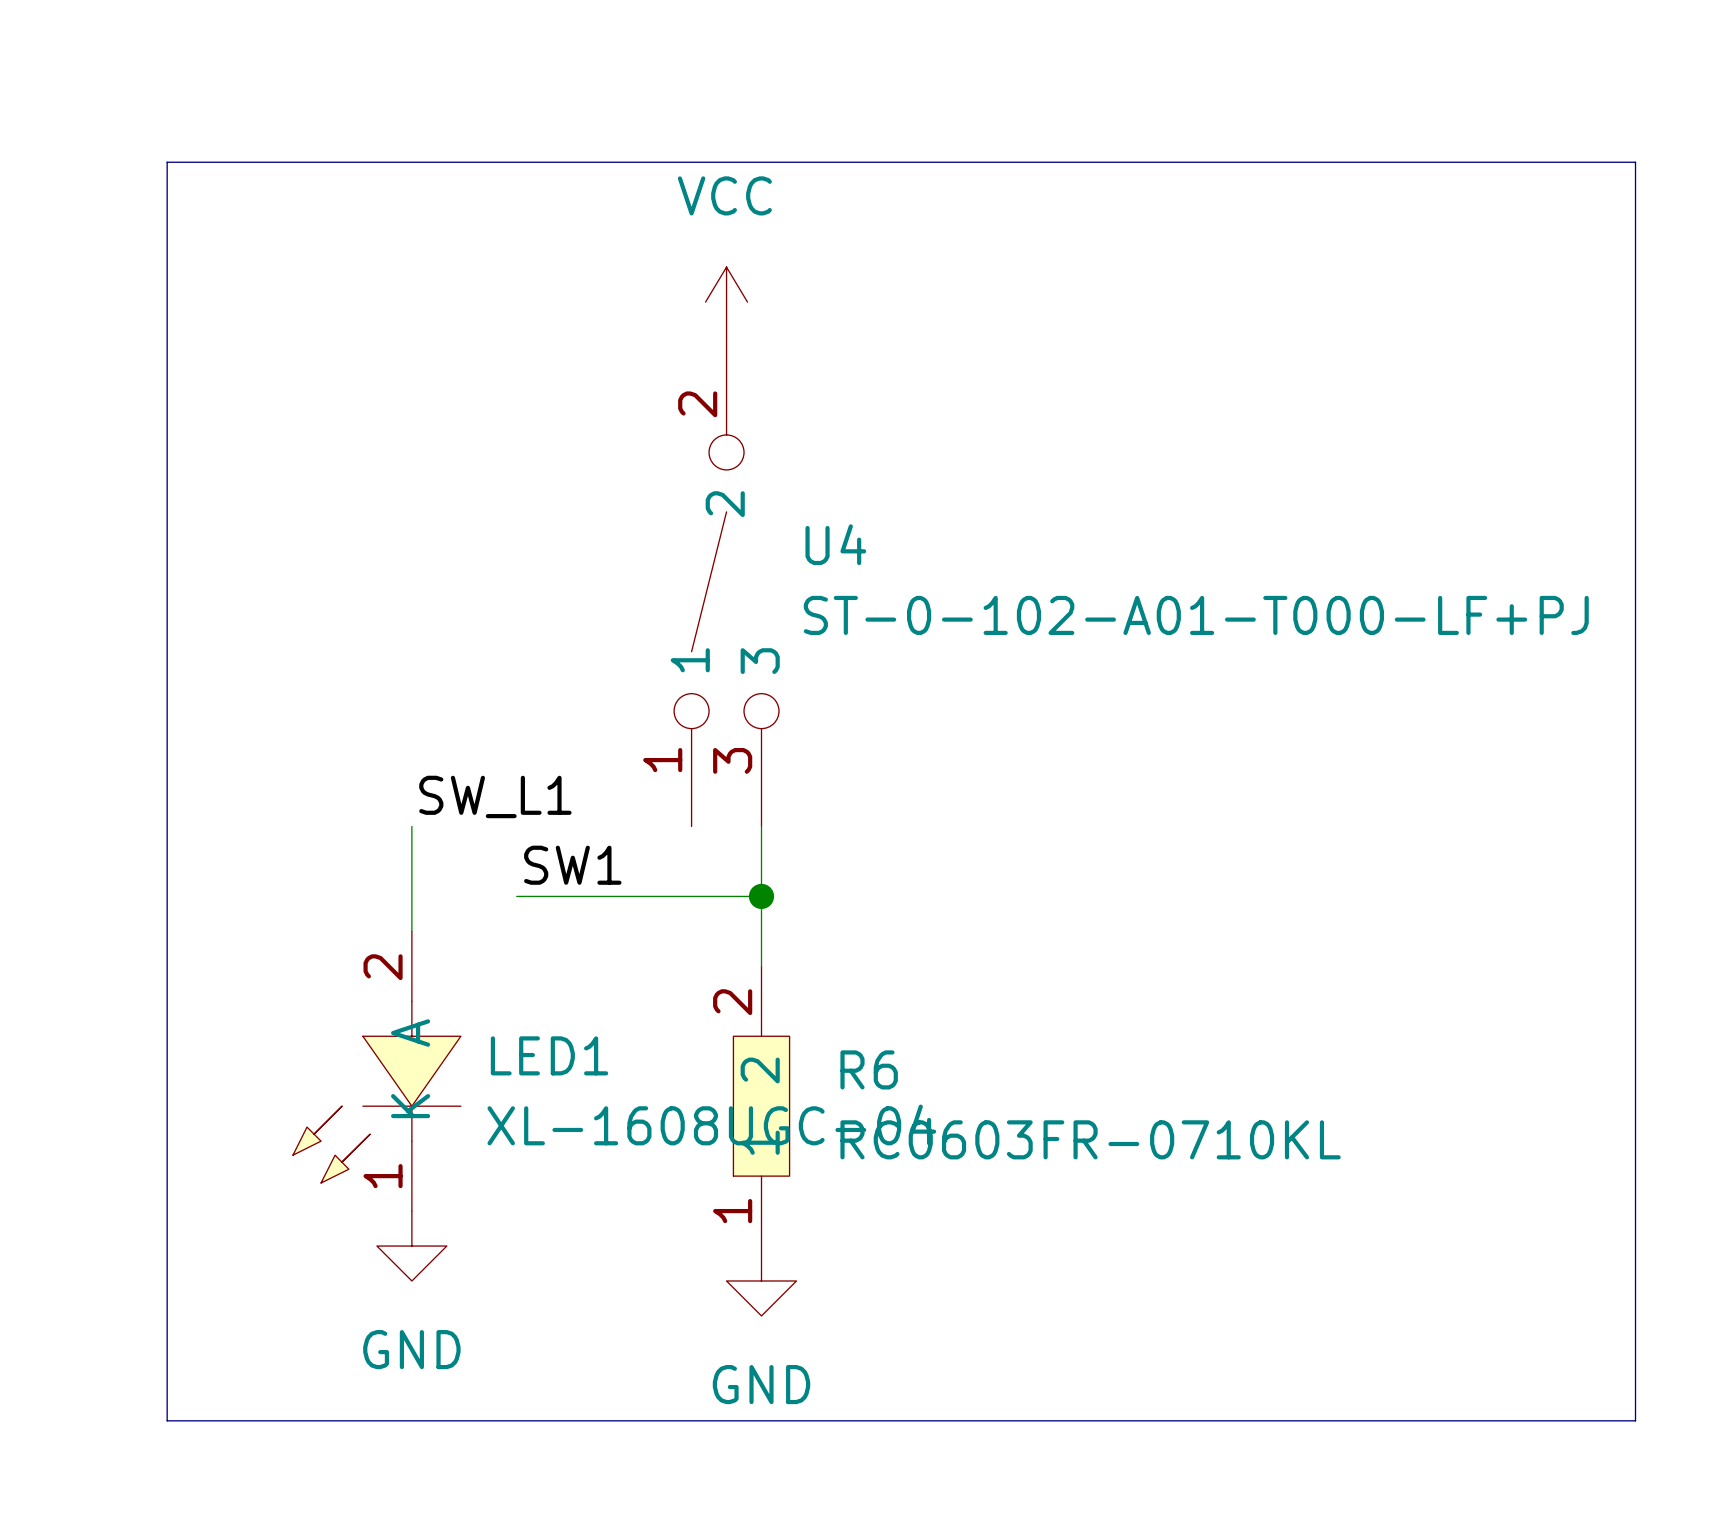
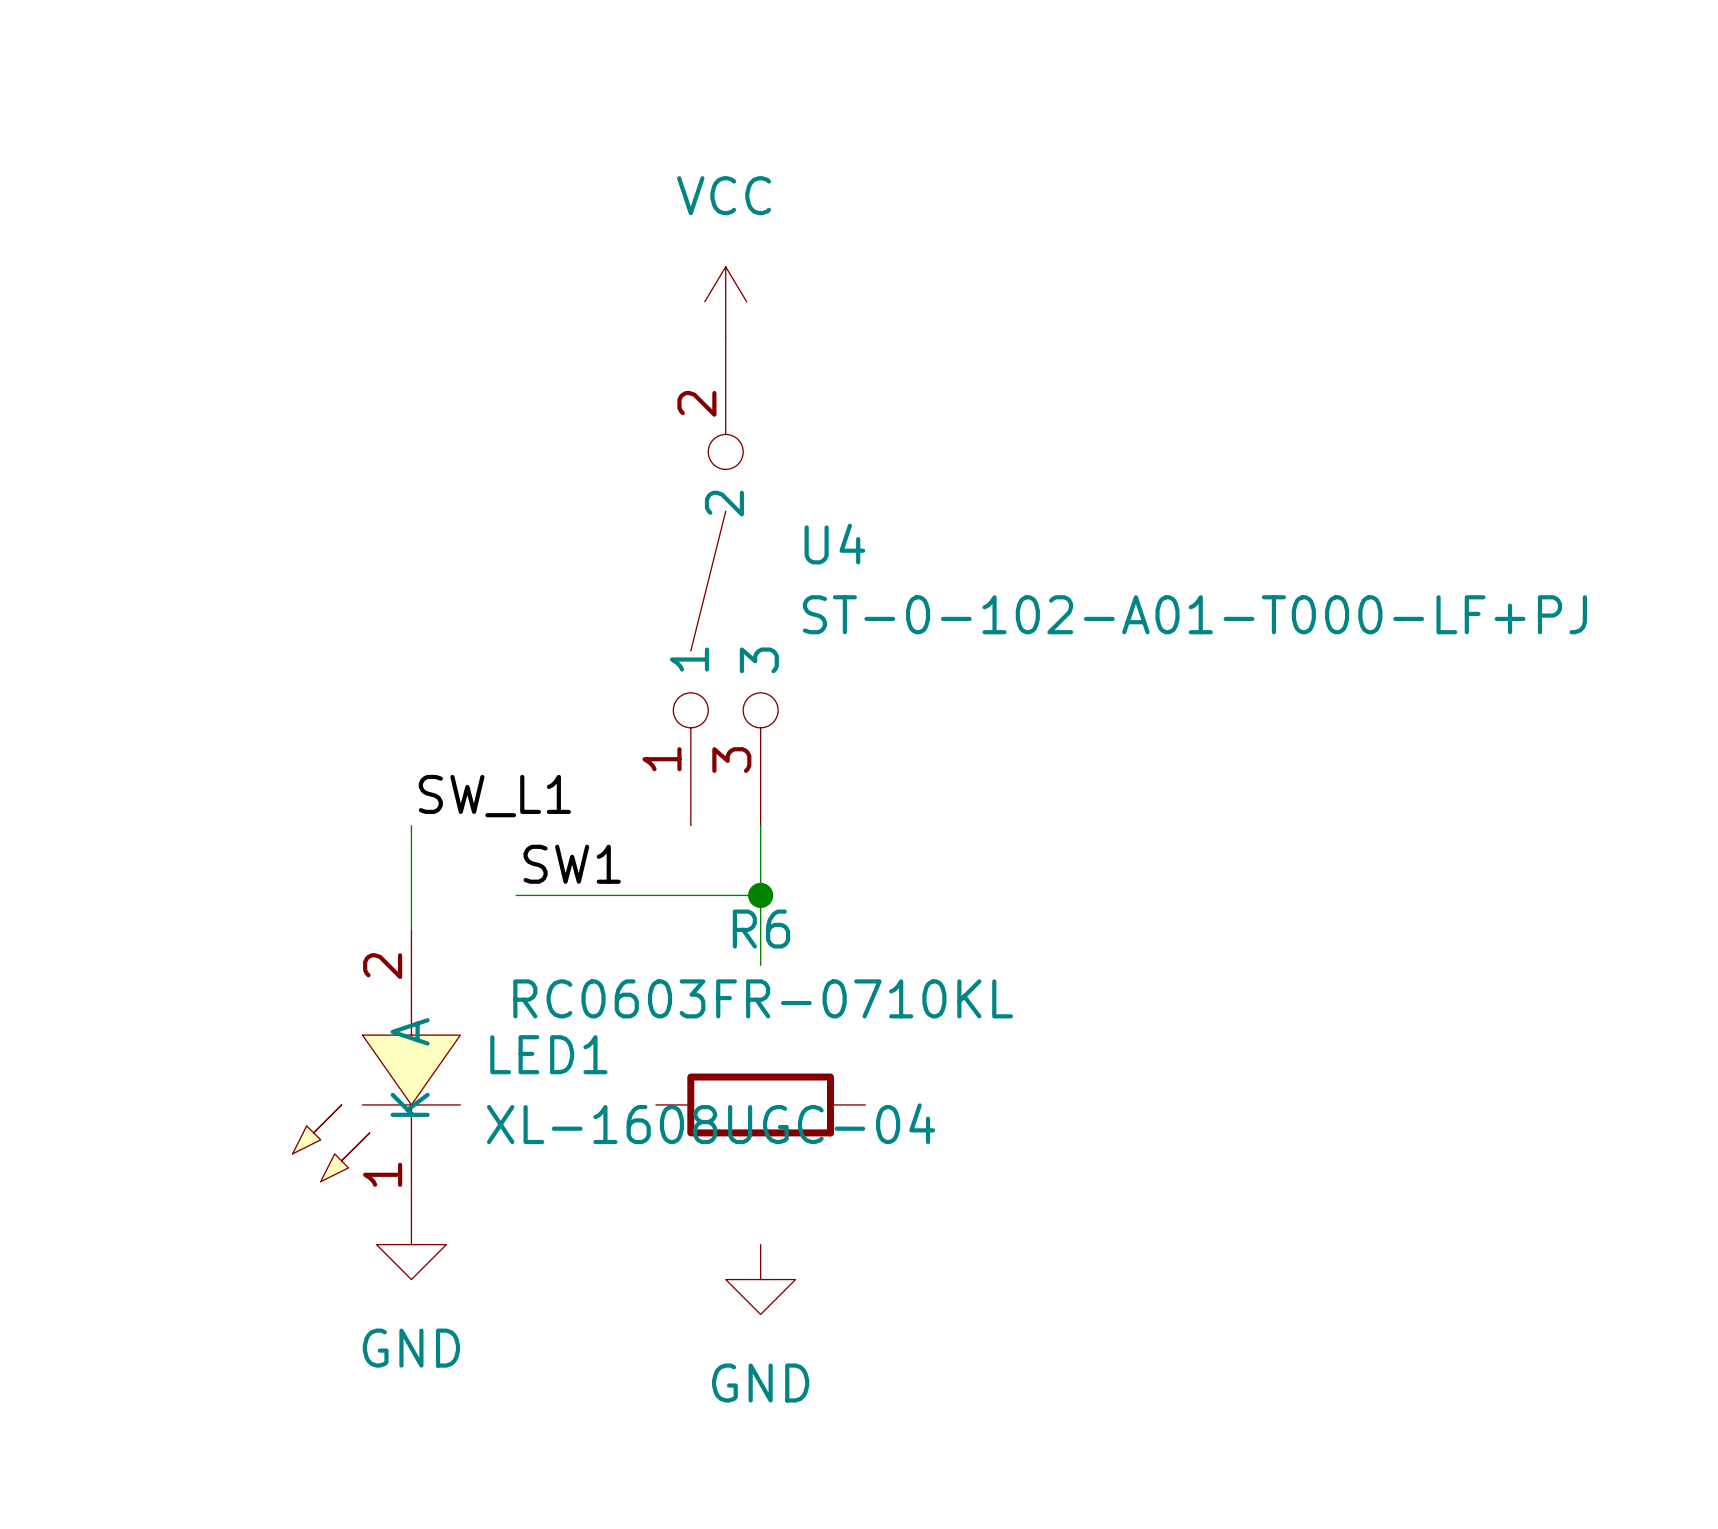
line: (167, 162) (1635, 162) (1635, 1420) (167, 1420) (167, 162) -> none
R6 symbol: [733, 966, 790, 1247] -> [655, 1073, 866, 1137]
R6 name position: R6 (869, 1069) -> R6 (761, 929)
R6 value position: RC0603FR-0710KL (1090, 1139) -> RC0603FR-0710KL (763, 998)

